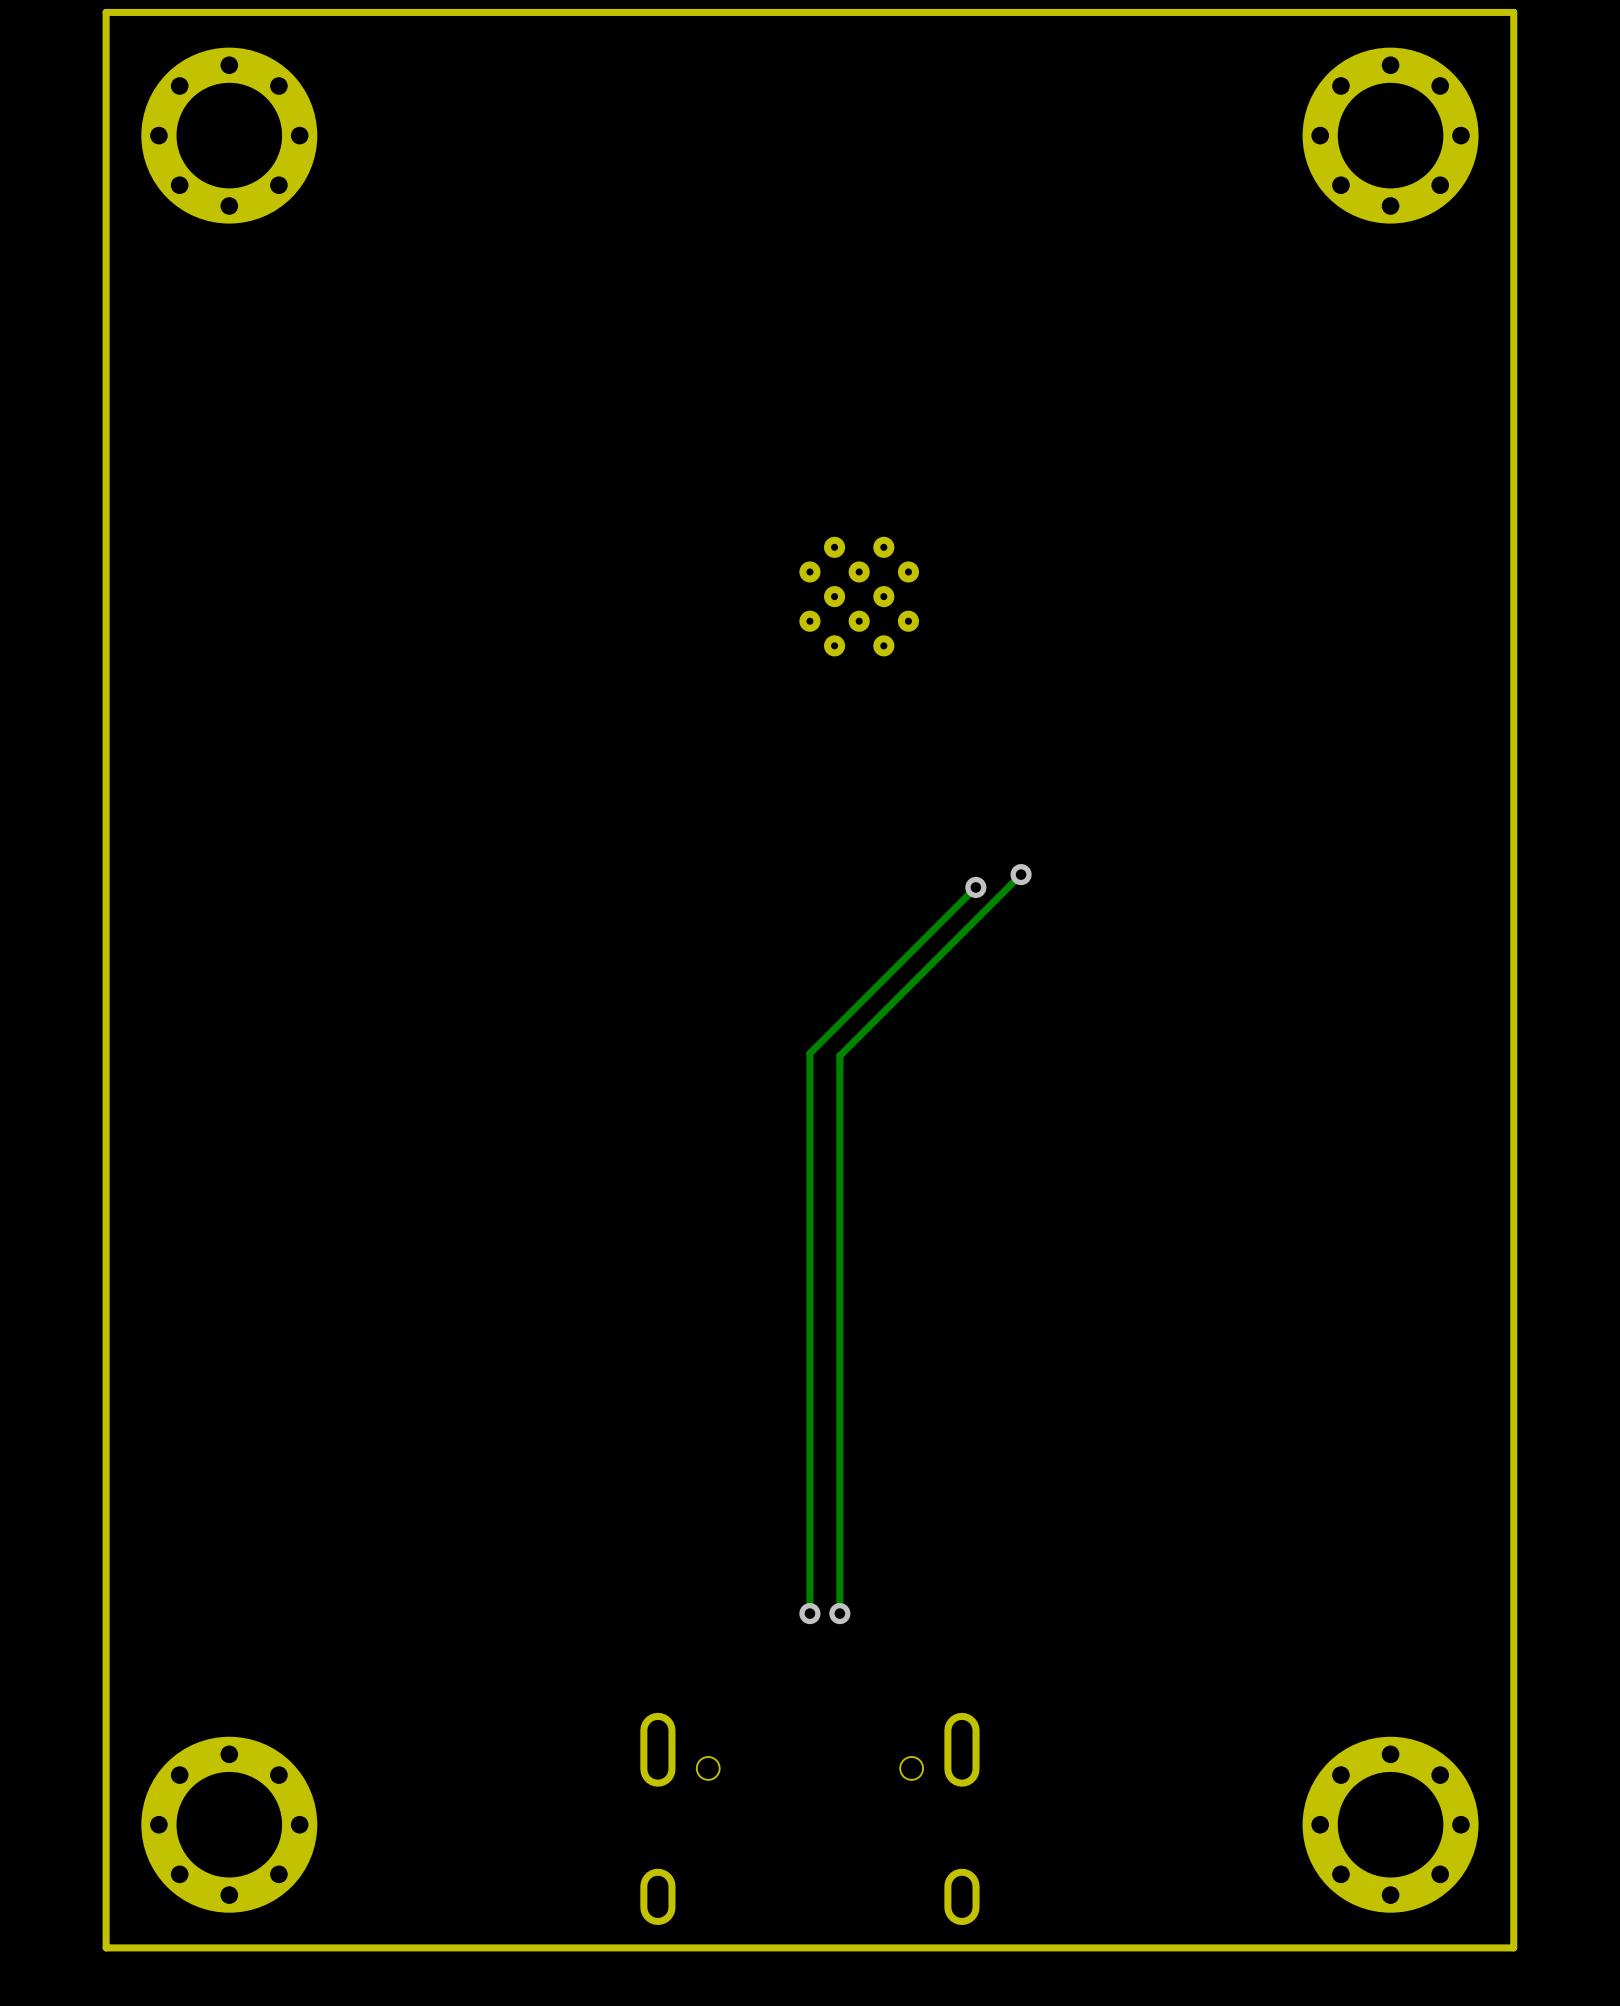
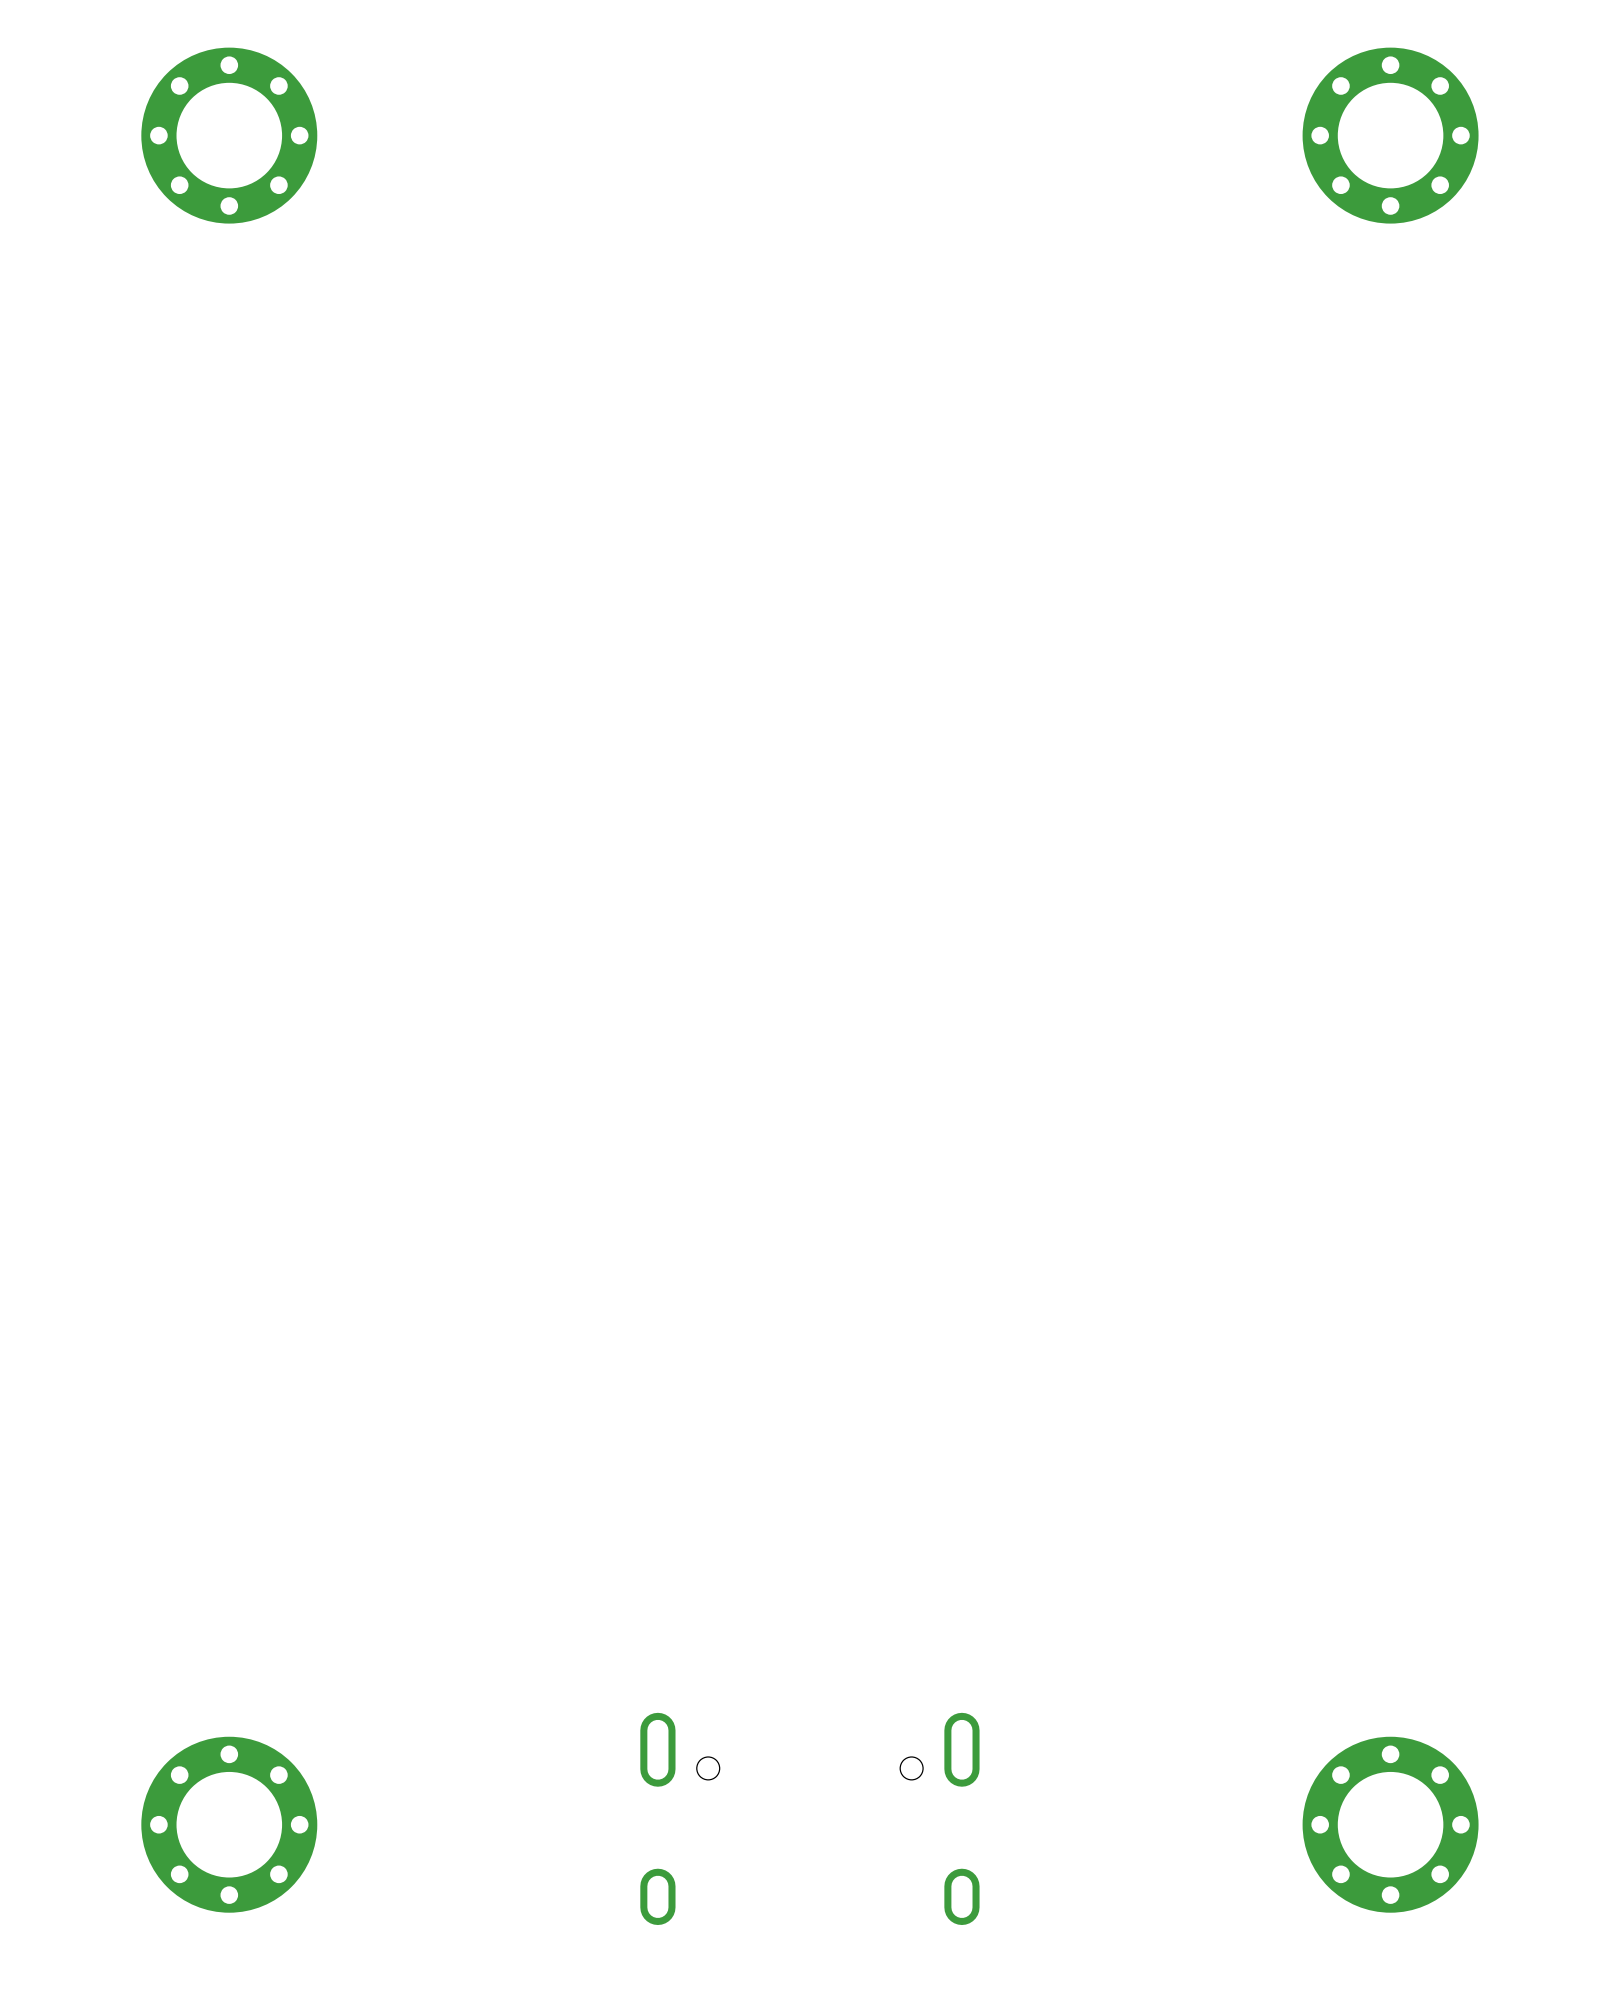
board edge: (1513, 12) (106, 12) (106, 1947) (1513, 1947) (1513, 12) -> none
part: (859, 596) -> none
track: (1021, 874) (839, 1055) (839, 1613) -> none
via: (1021, 874) -> none
track: (975, 887) (809, 1053) (809, 1613) -> none
via: (975, 887) -> none
via: (809, 1613) -> none
via: (839, 1613) -> none

